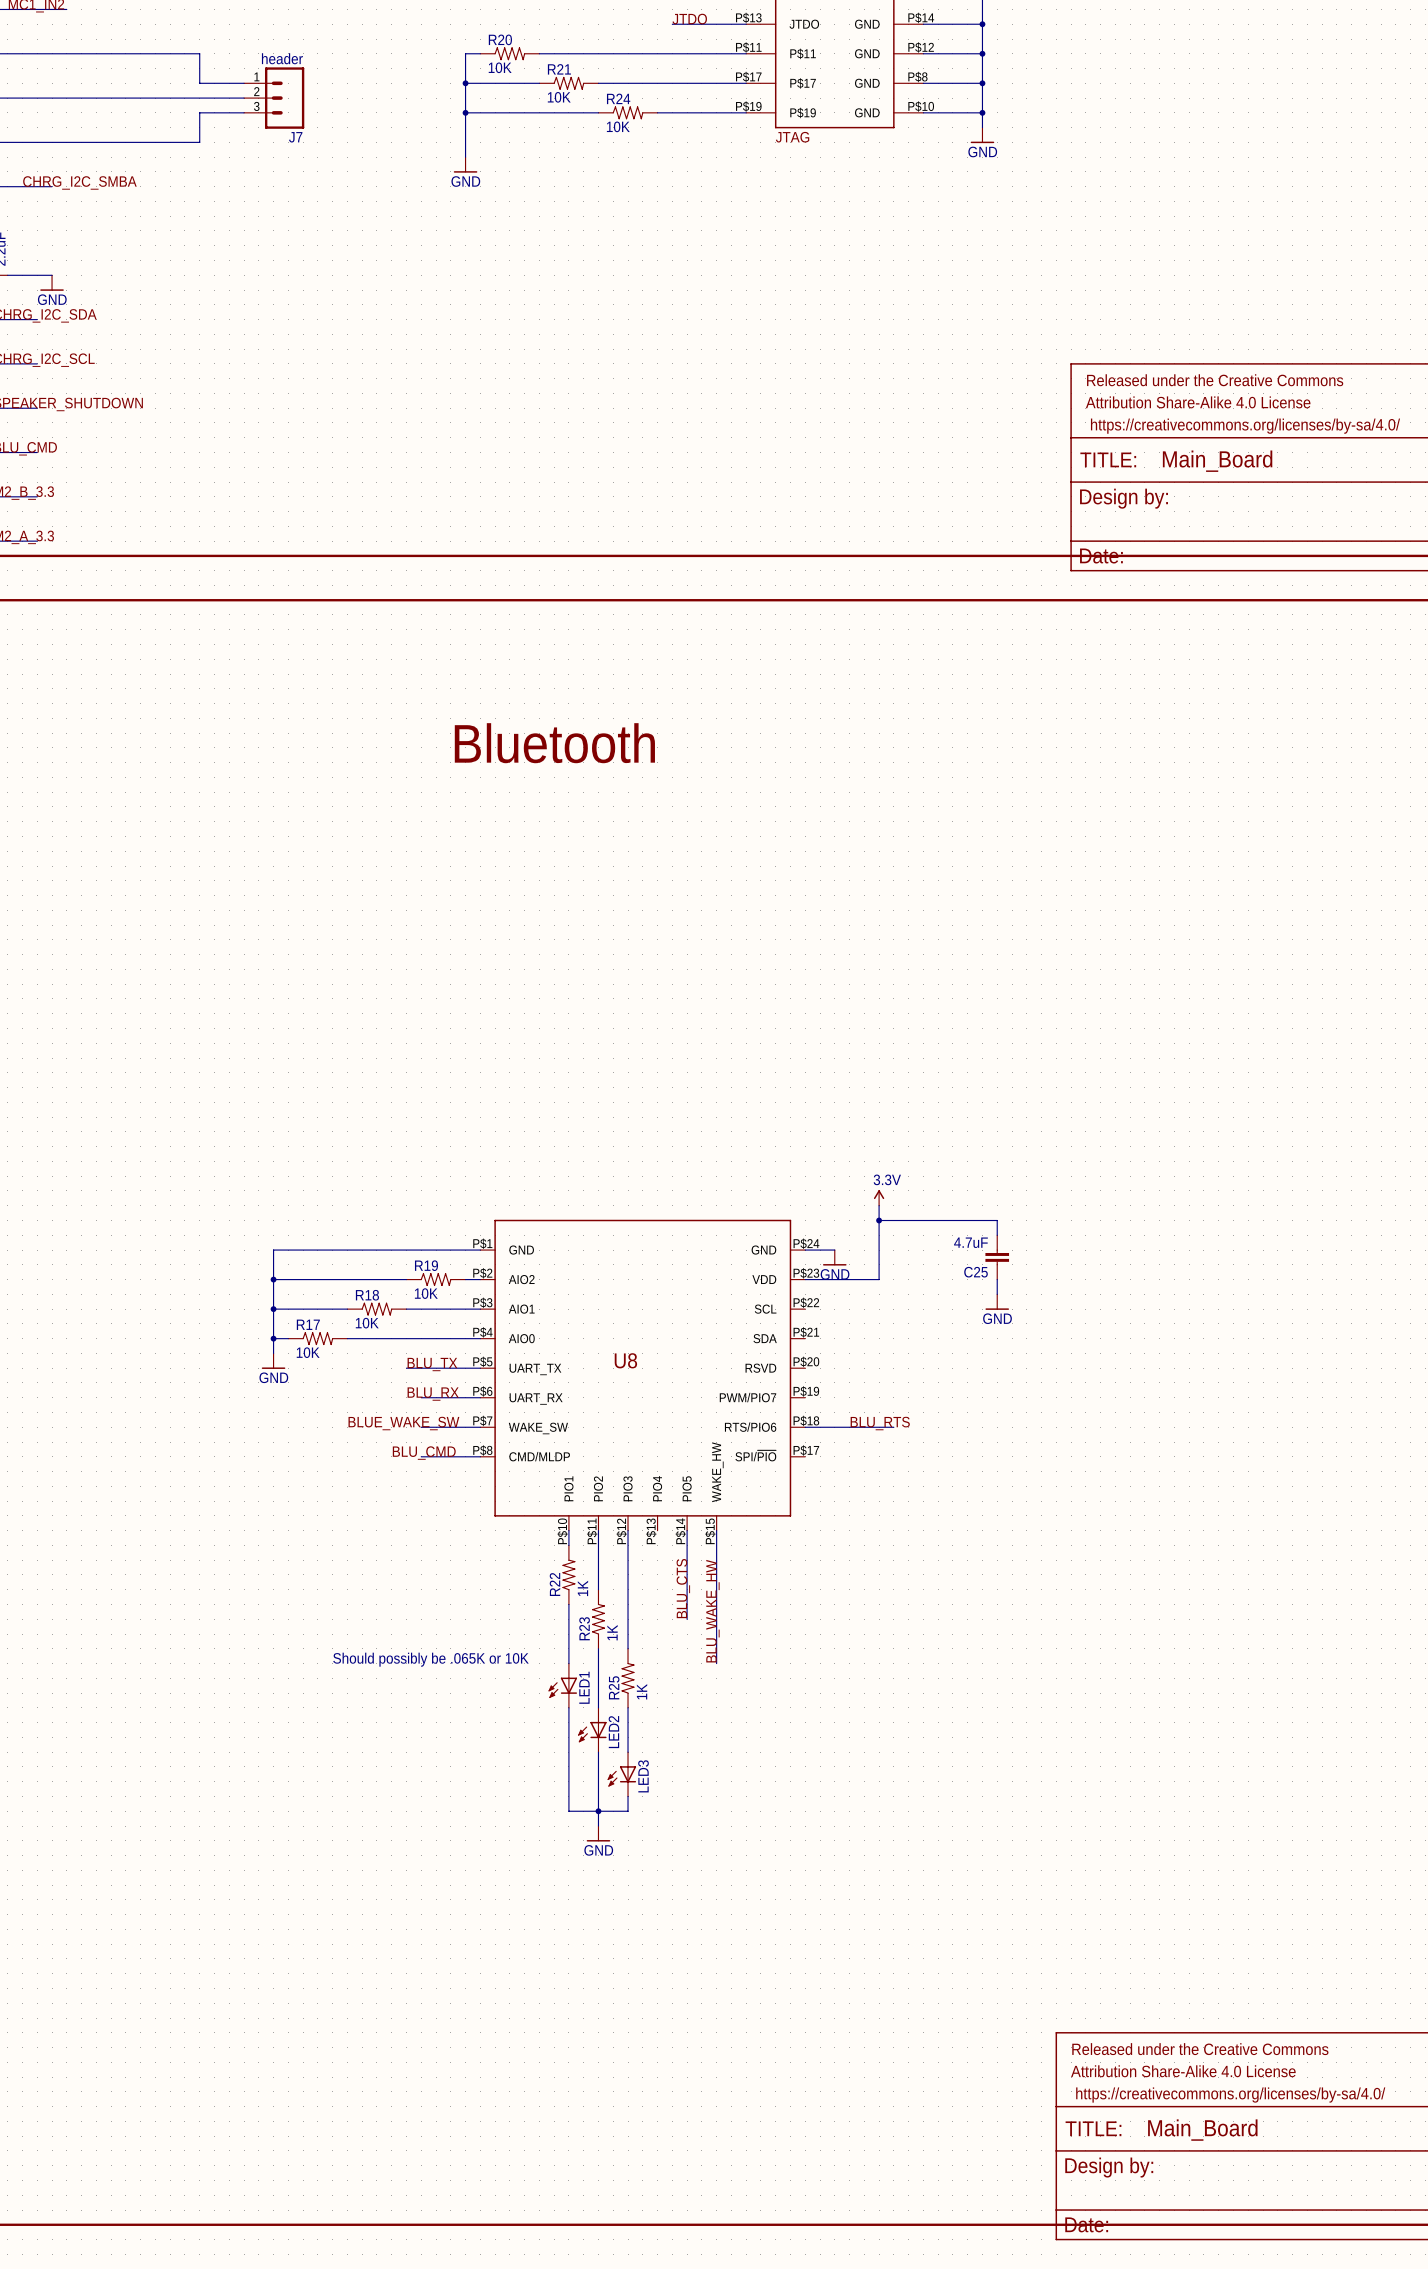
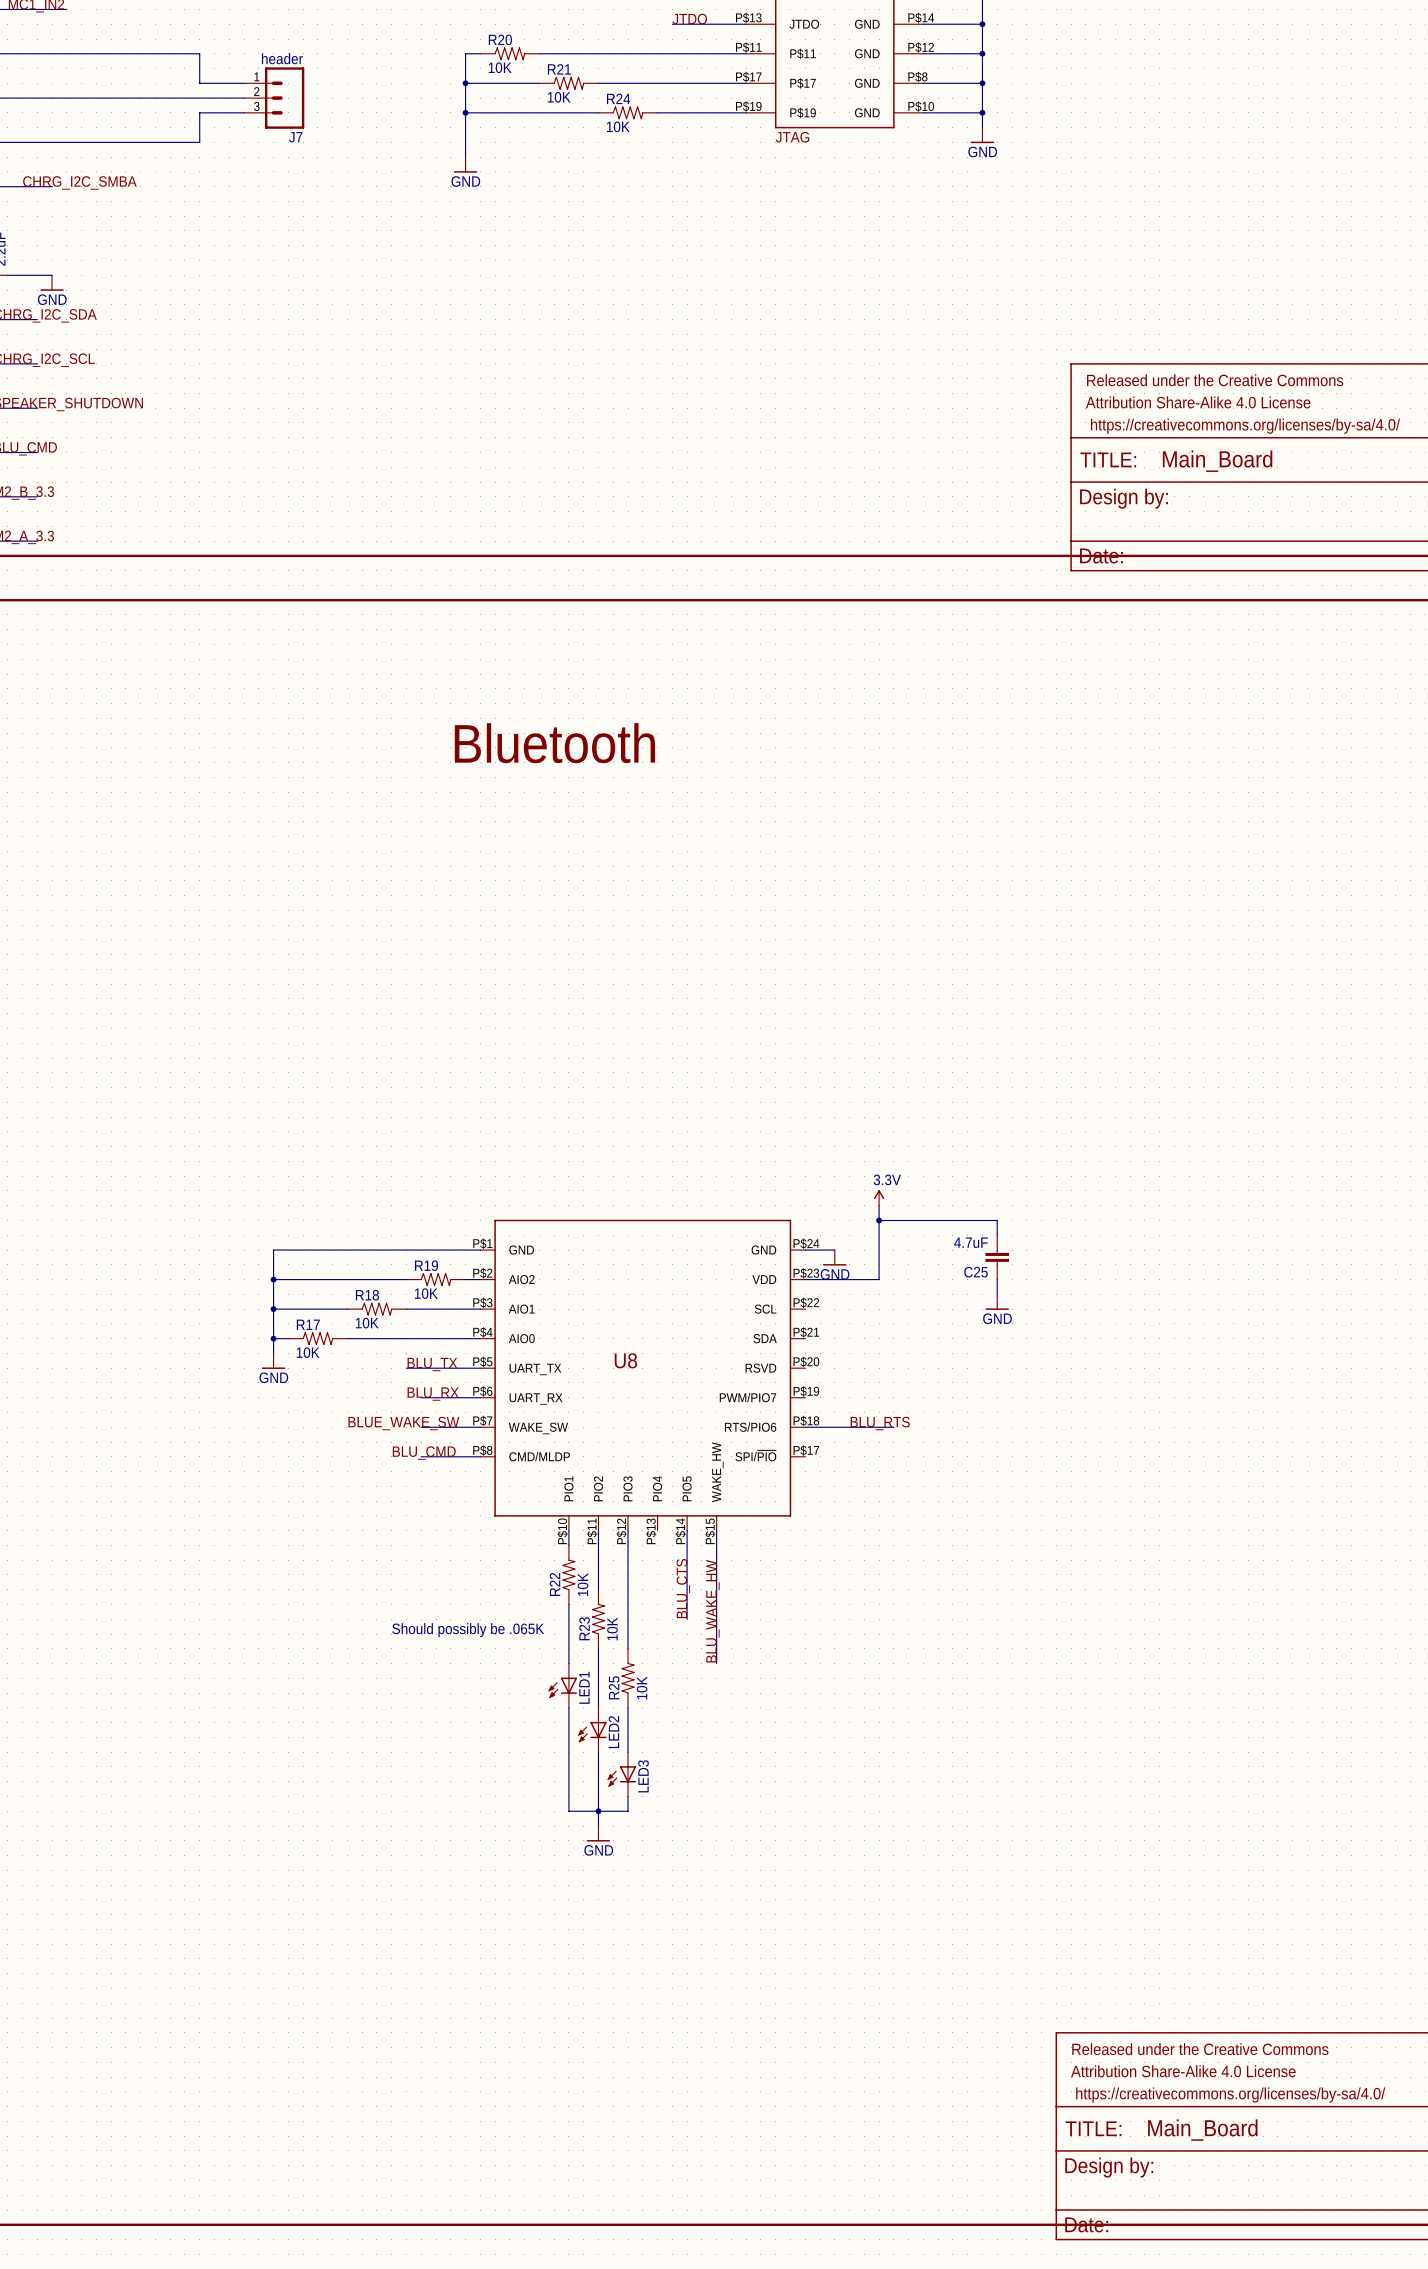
R22 value: 1K (582, 1588) -> 10K (582, 1584)
text: none -> Should possibly be .065K (468, 1630)
R23 value: 1K (612, 1632) -> 10K (612, 1628)
text: Should possibly be .065K or 10K (430, 1659) -> none
R25 value: 1K (642, 1691) -> 10K (642, 1688)

